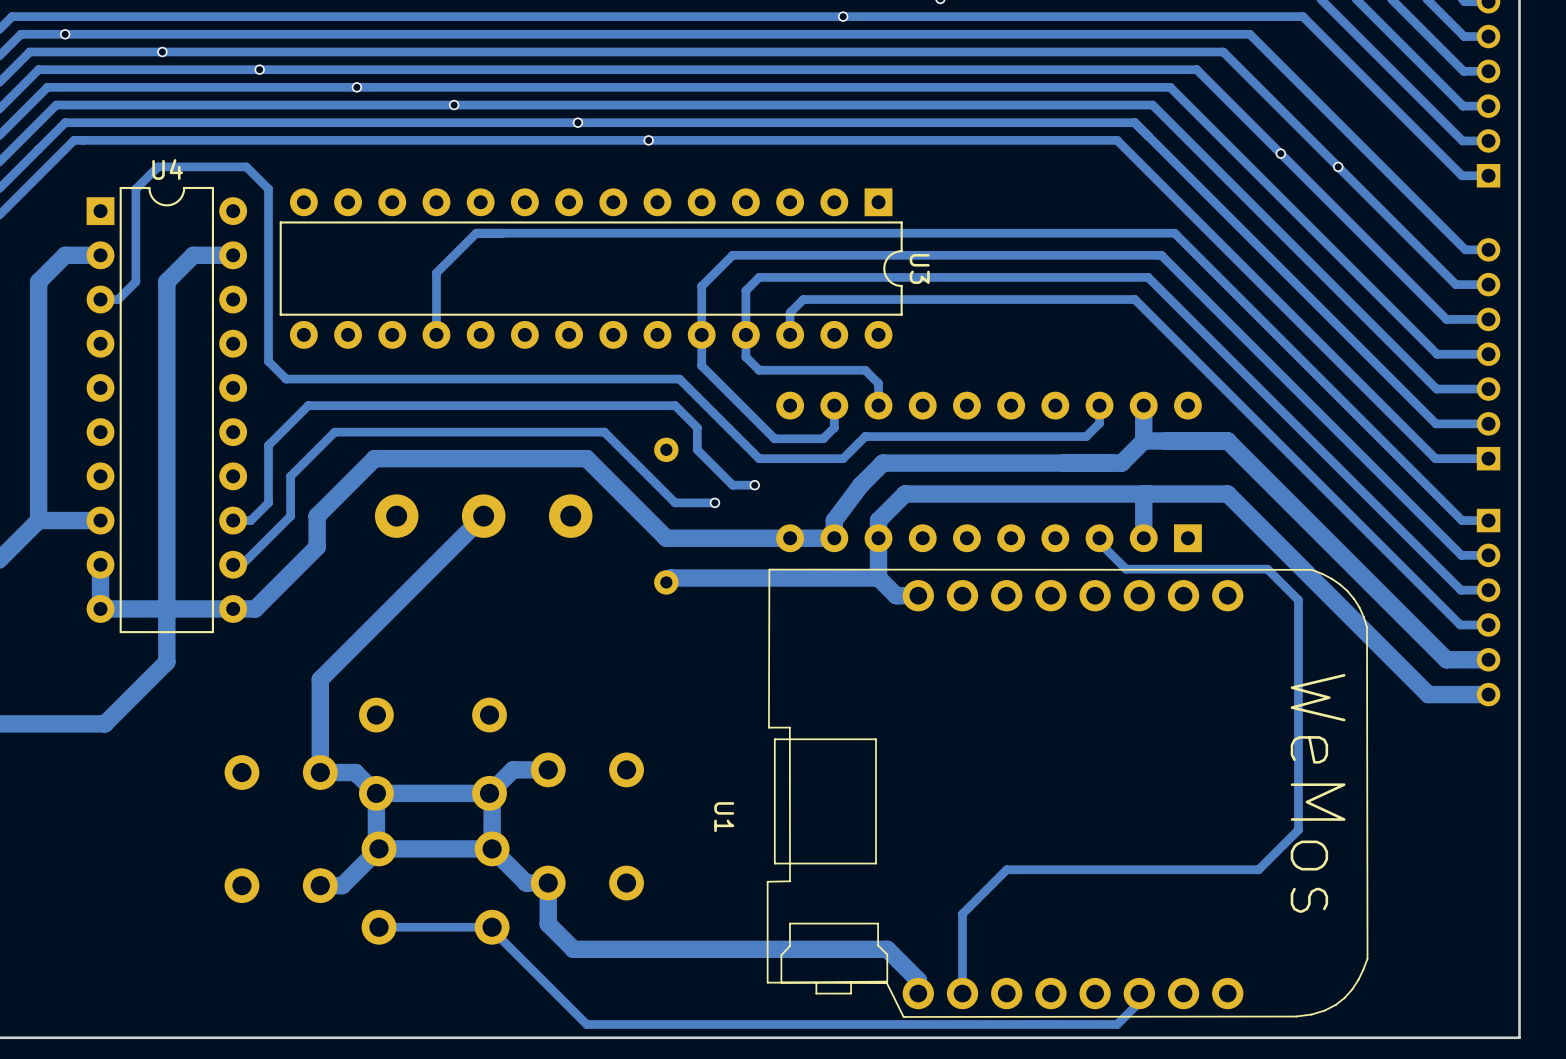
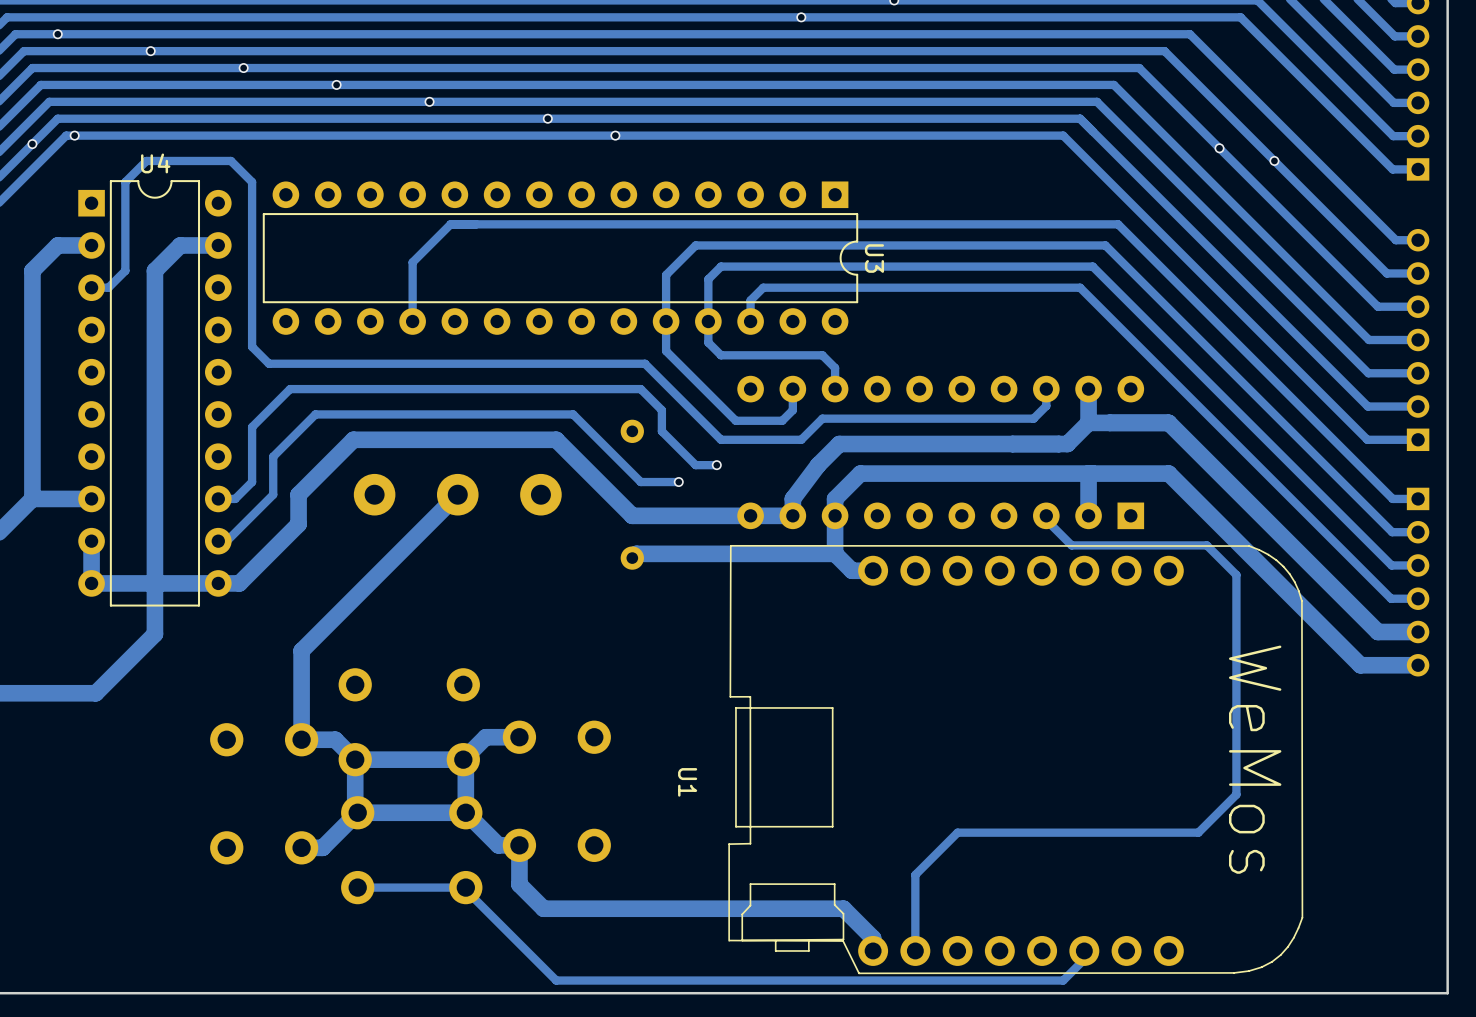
via: none -> (74, 135)
via: none -> (32, 144)

